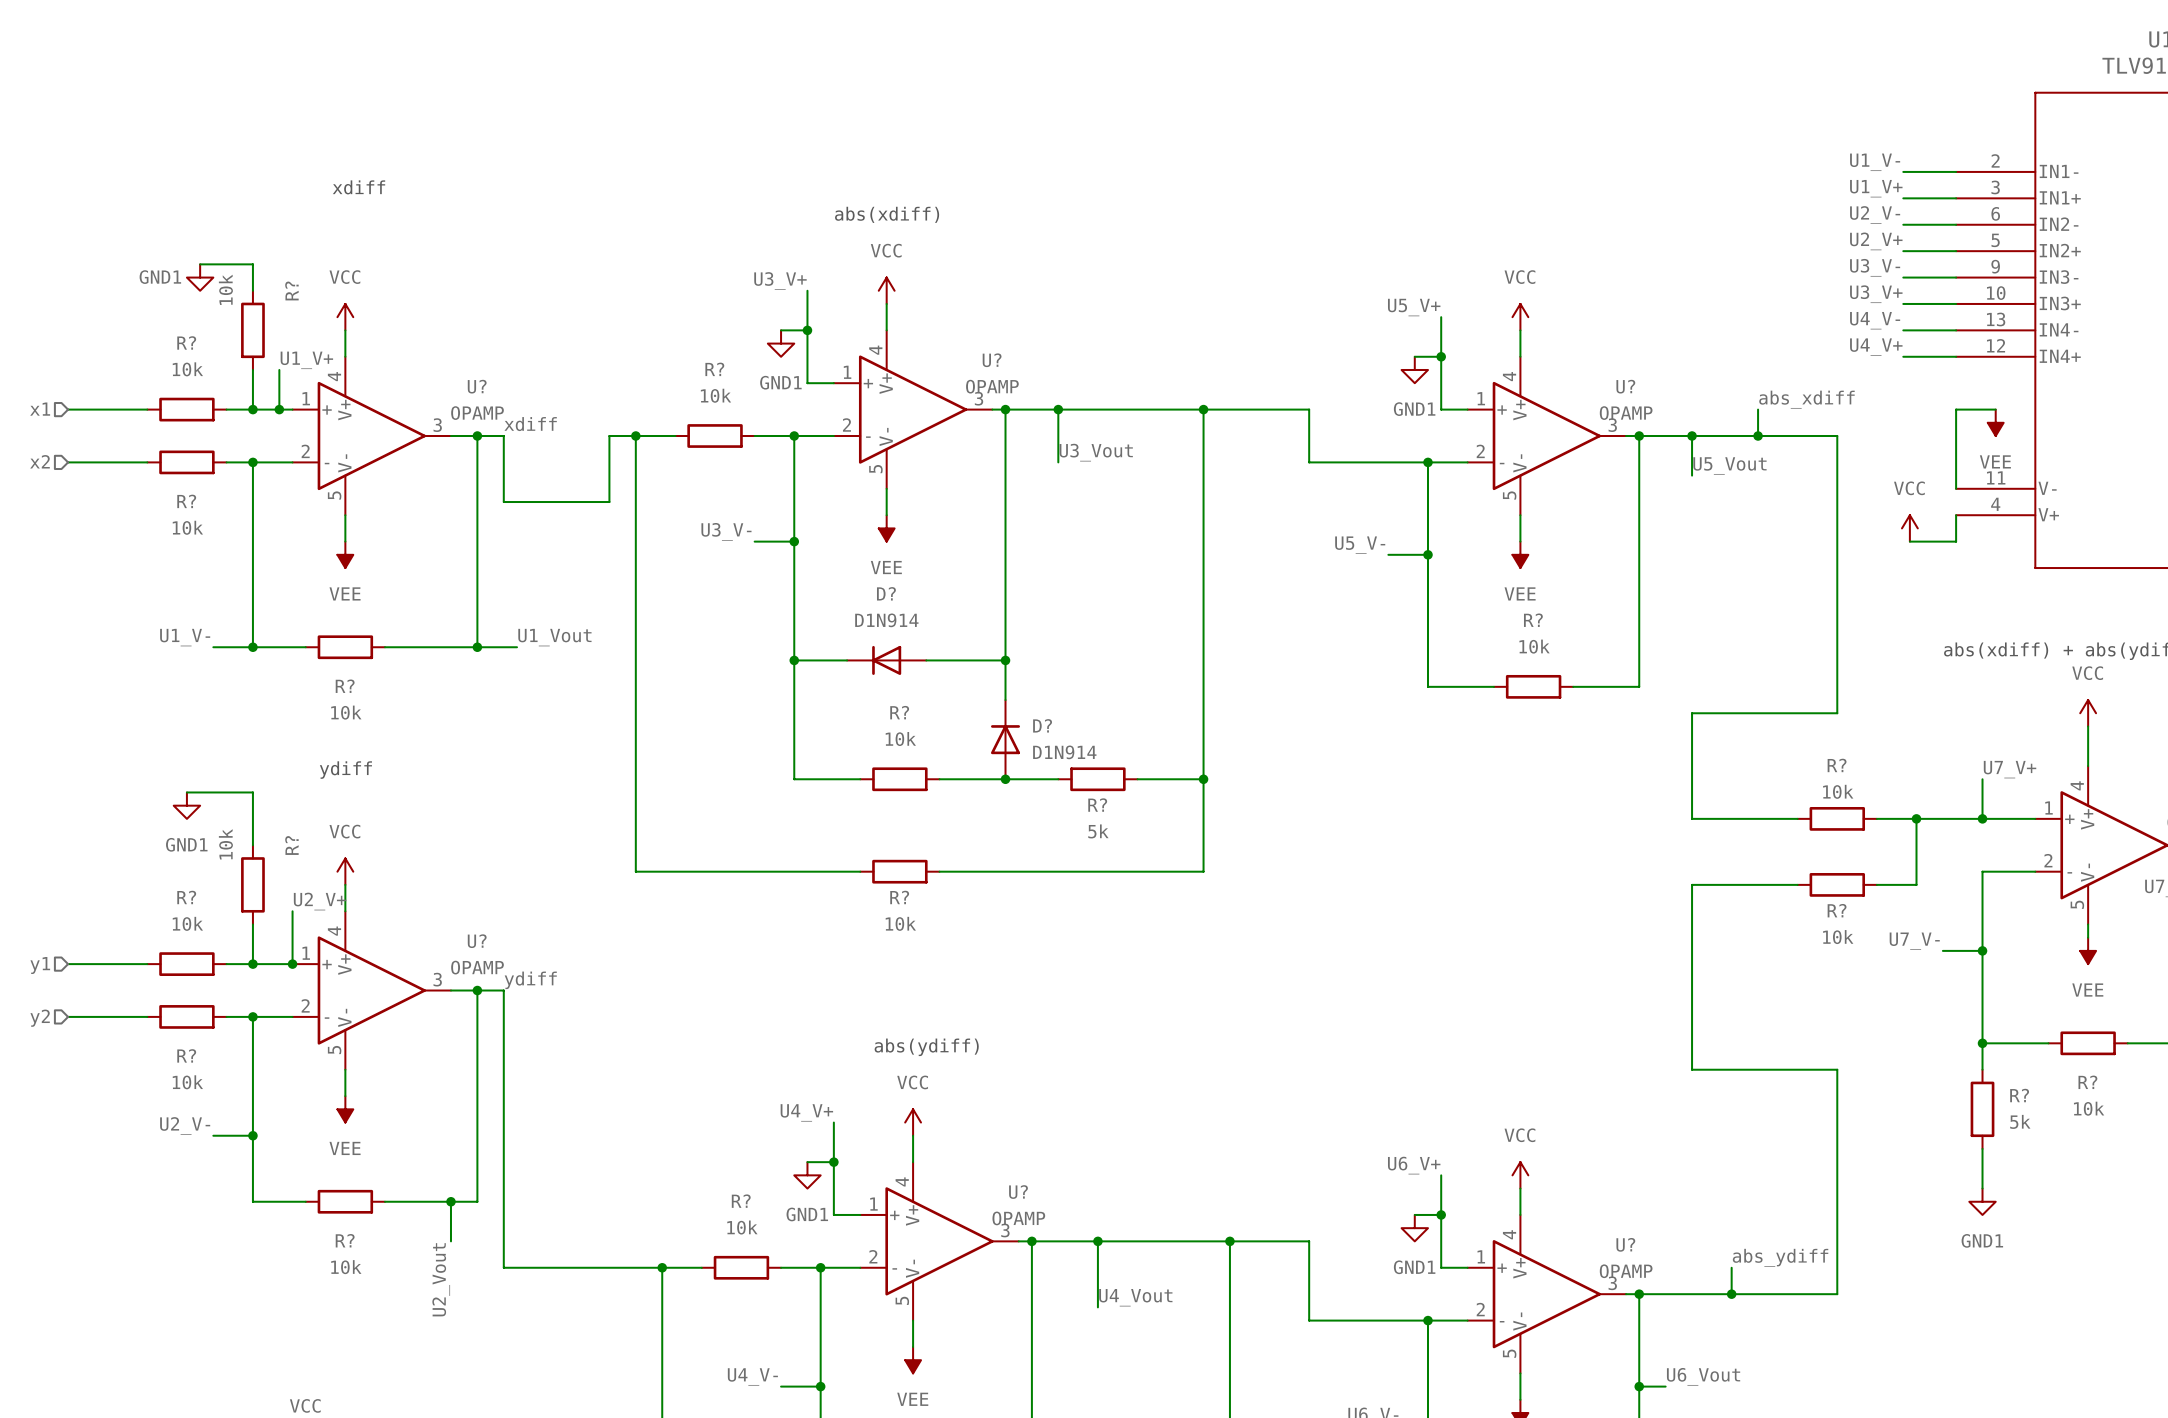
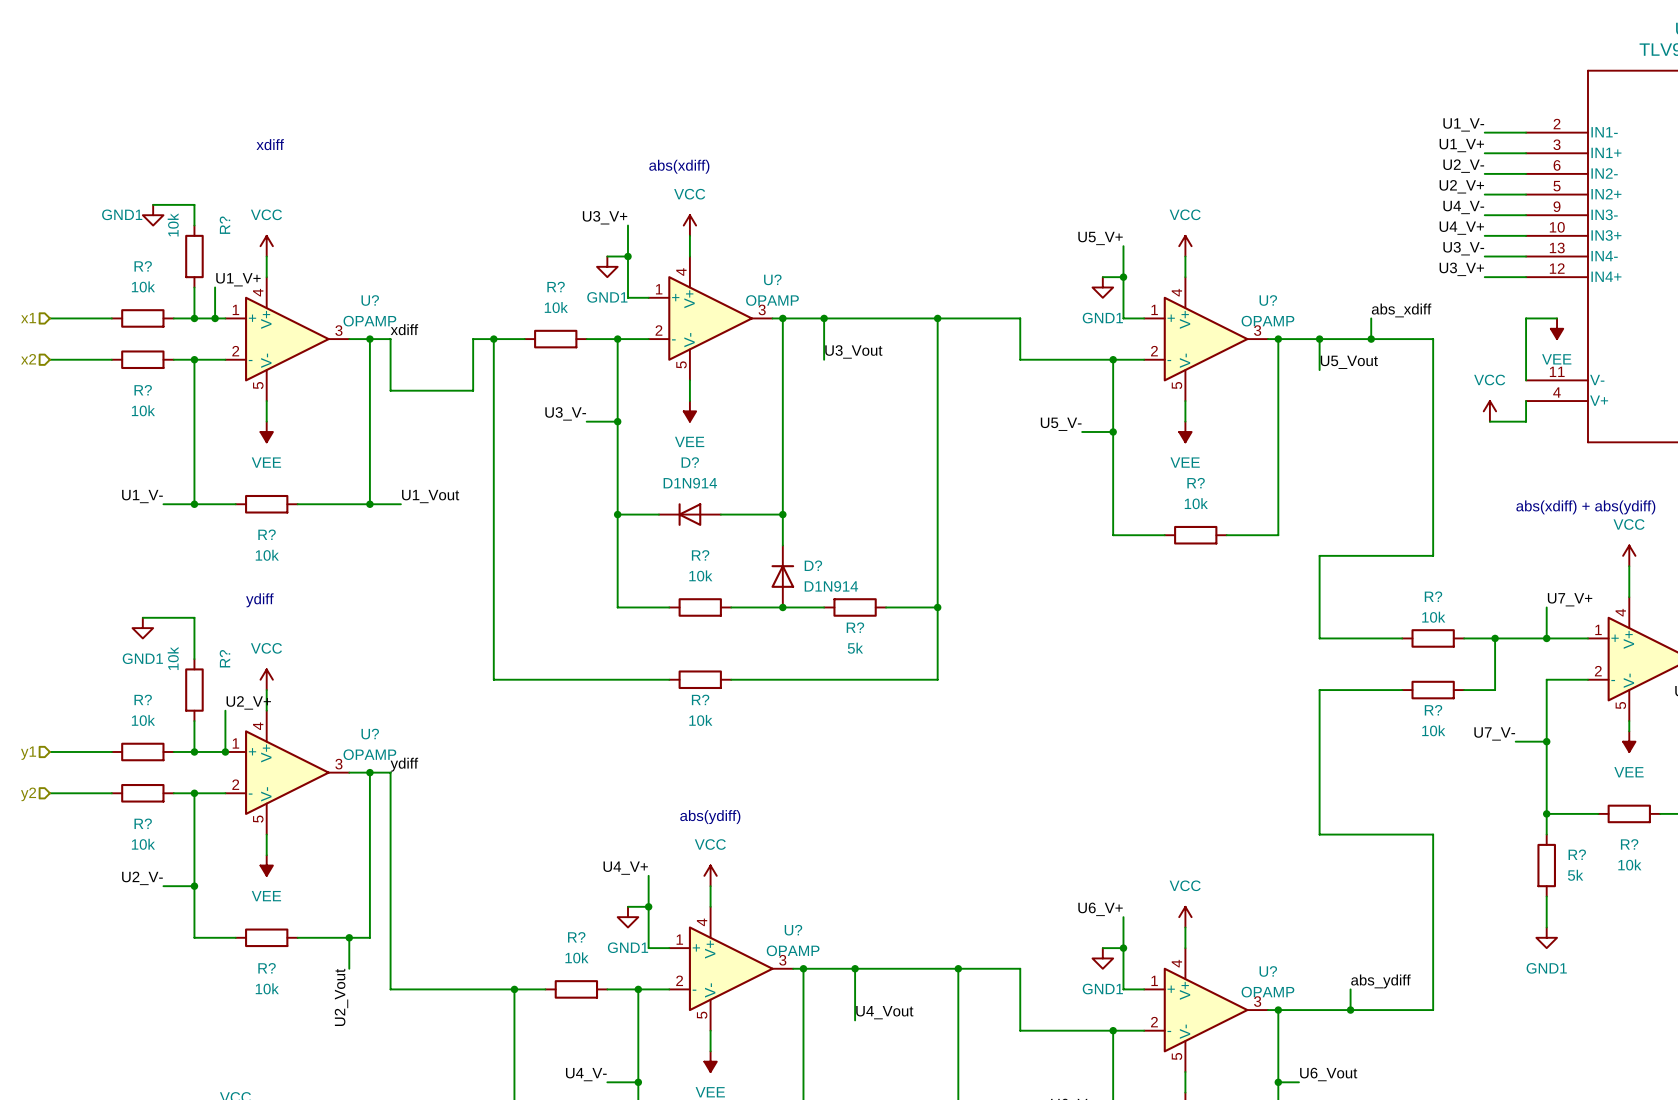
label: U3_V- (1875, 267) -> U4_V- (1463, 207)
label: U3_V+ (1876, 294) -> U4_V+ (1461, 228)
label: U4_V- (1875, 320) -> U3_V- (1463, 248)
label: U4_V+ (1876, 347) -> U3_V+ (1461, 269)

